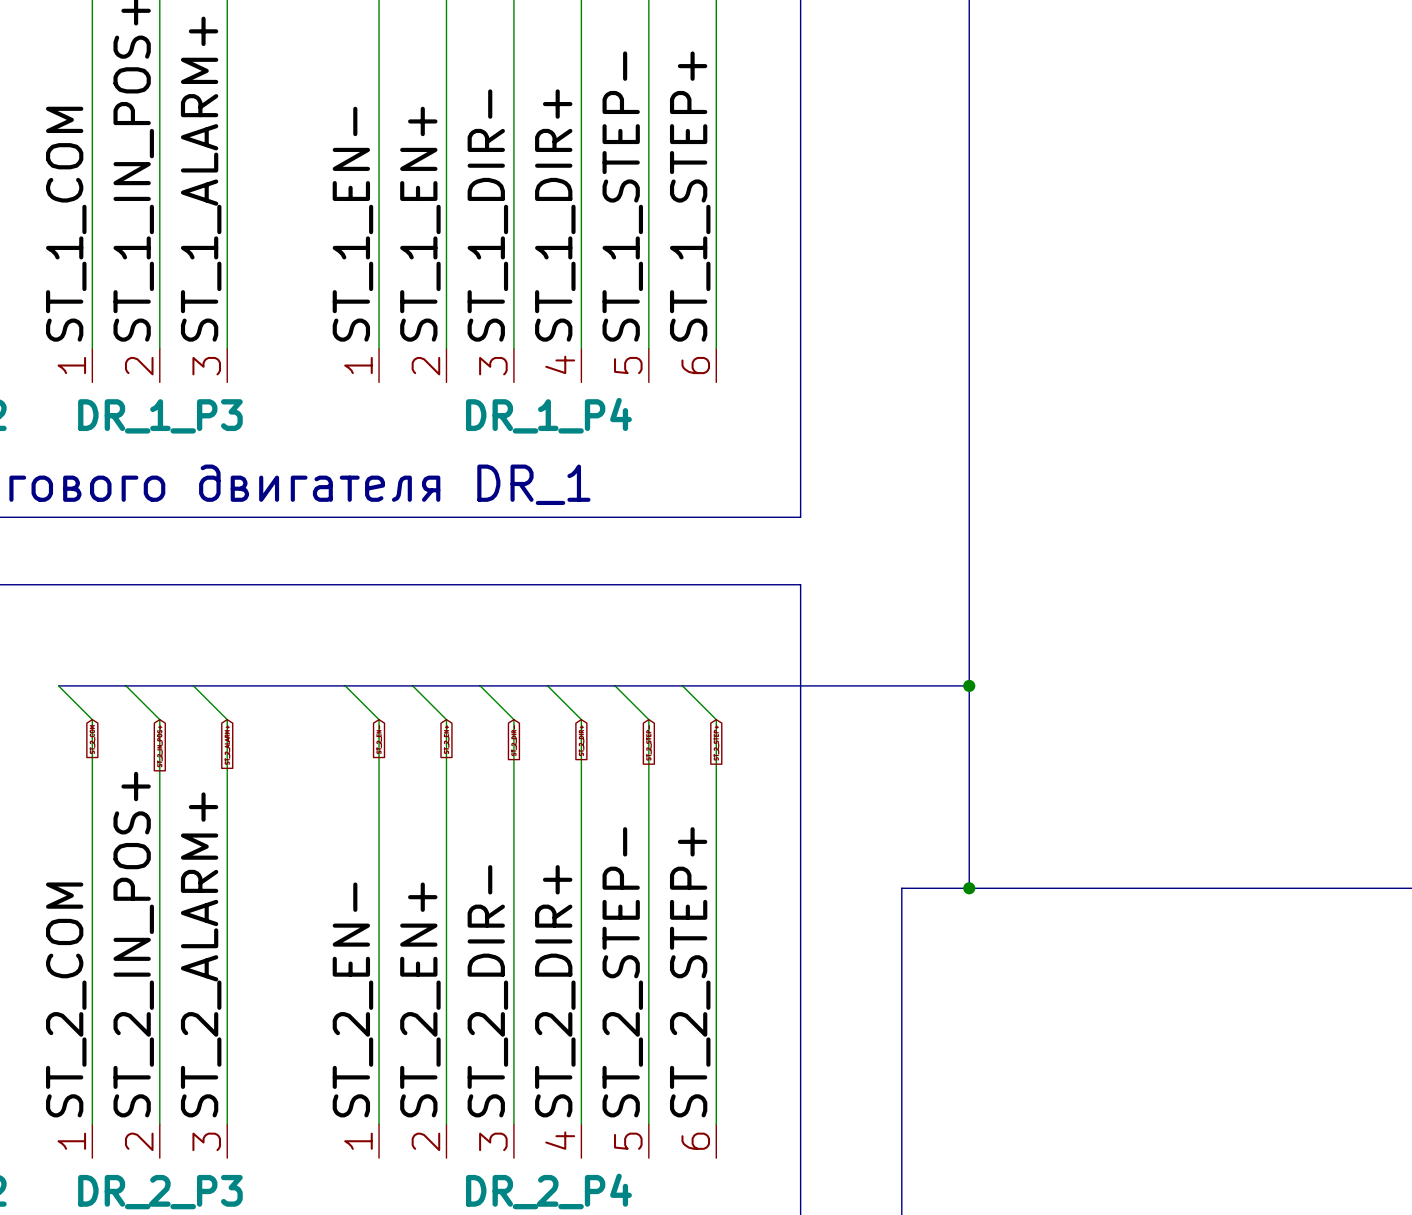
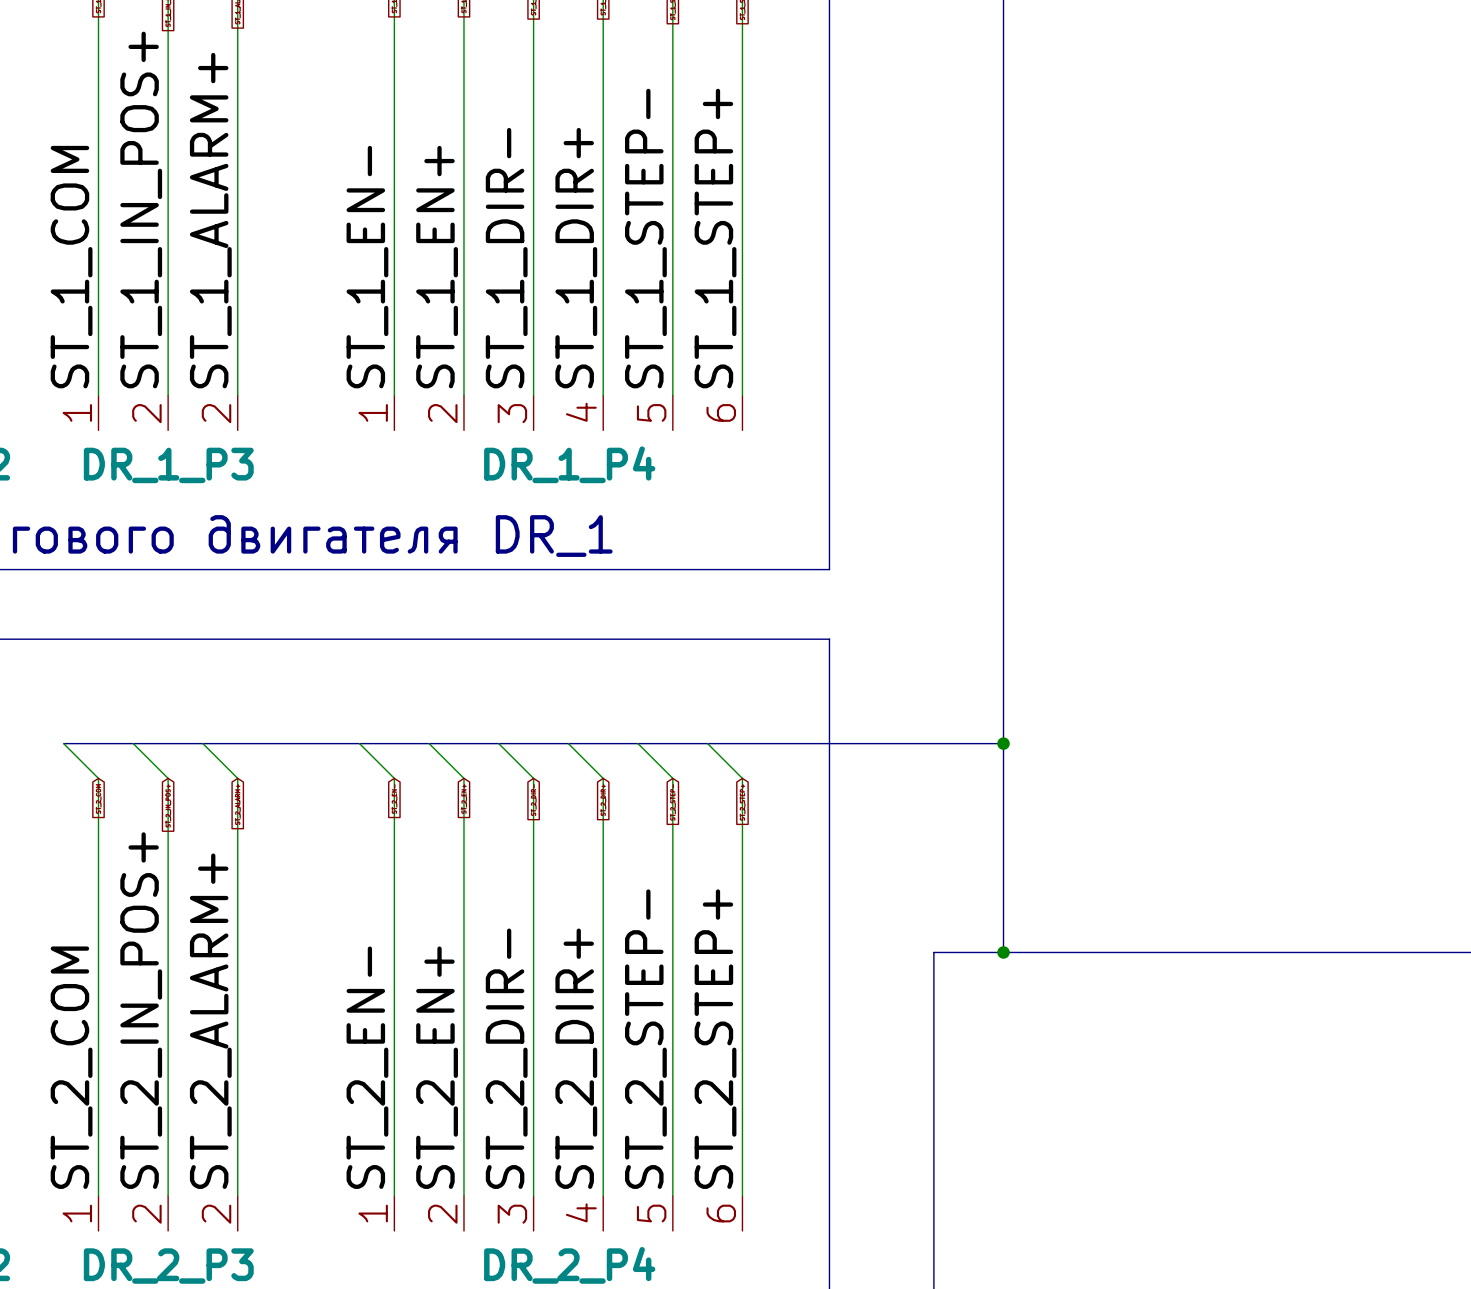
DR_1_P3 pin number: 3 (206, 366) -> 2 (216, 413)
DR_2_P3 pin number: 3 (206, 1141) -> 2 (216, 1214)

